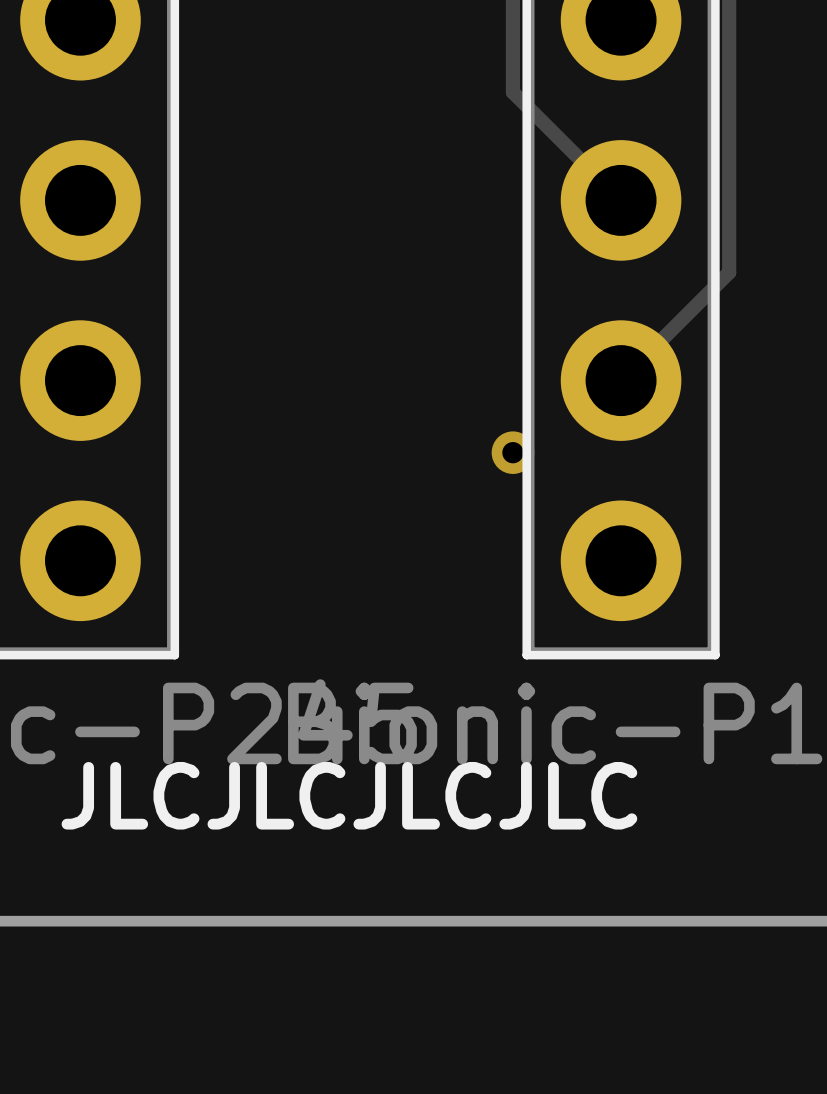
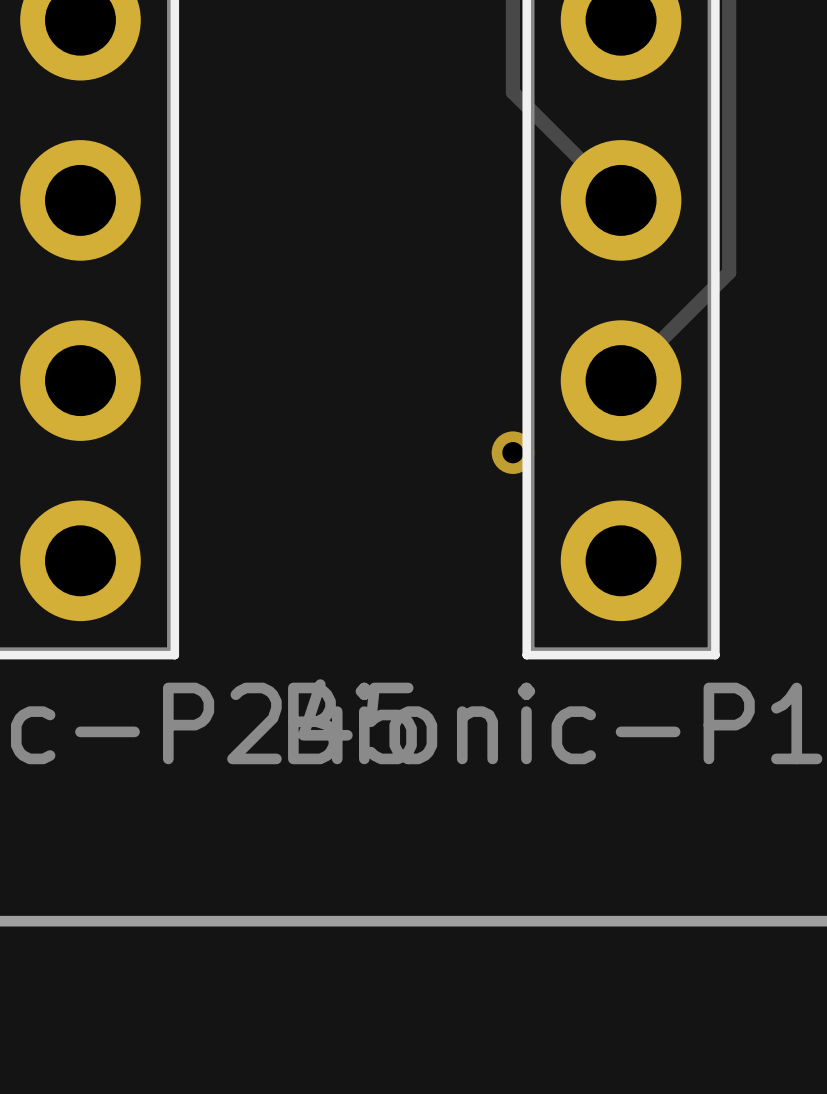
text: JLCJLCJLCJLC (349, 795) -> none

